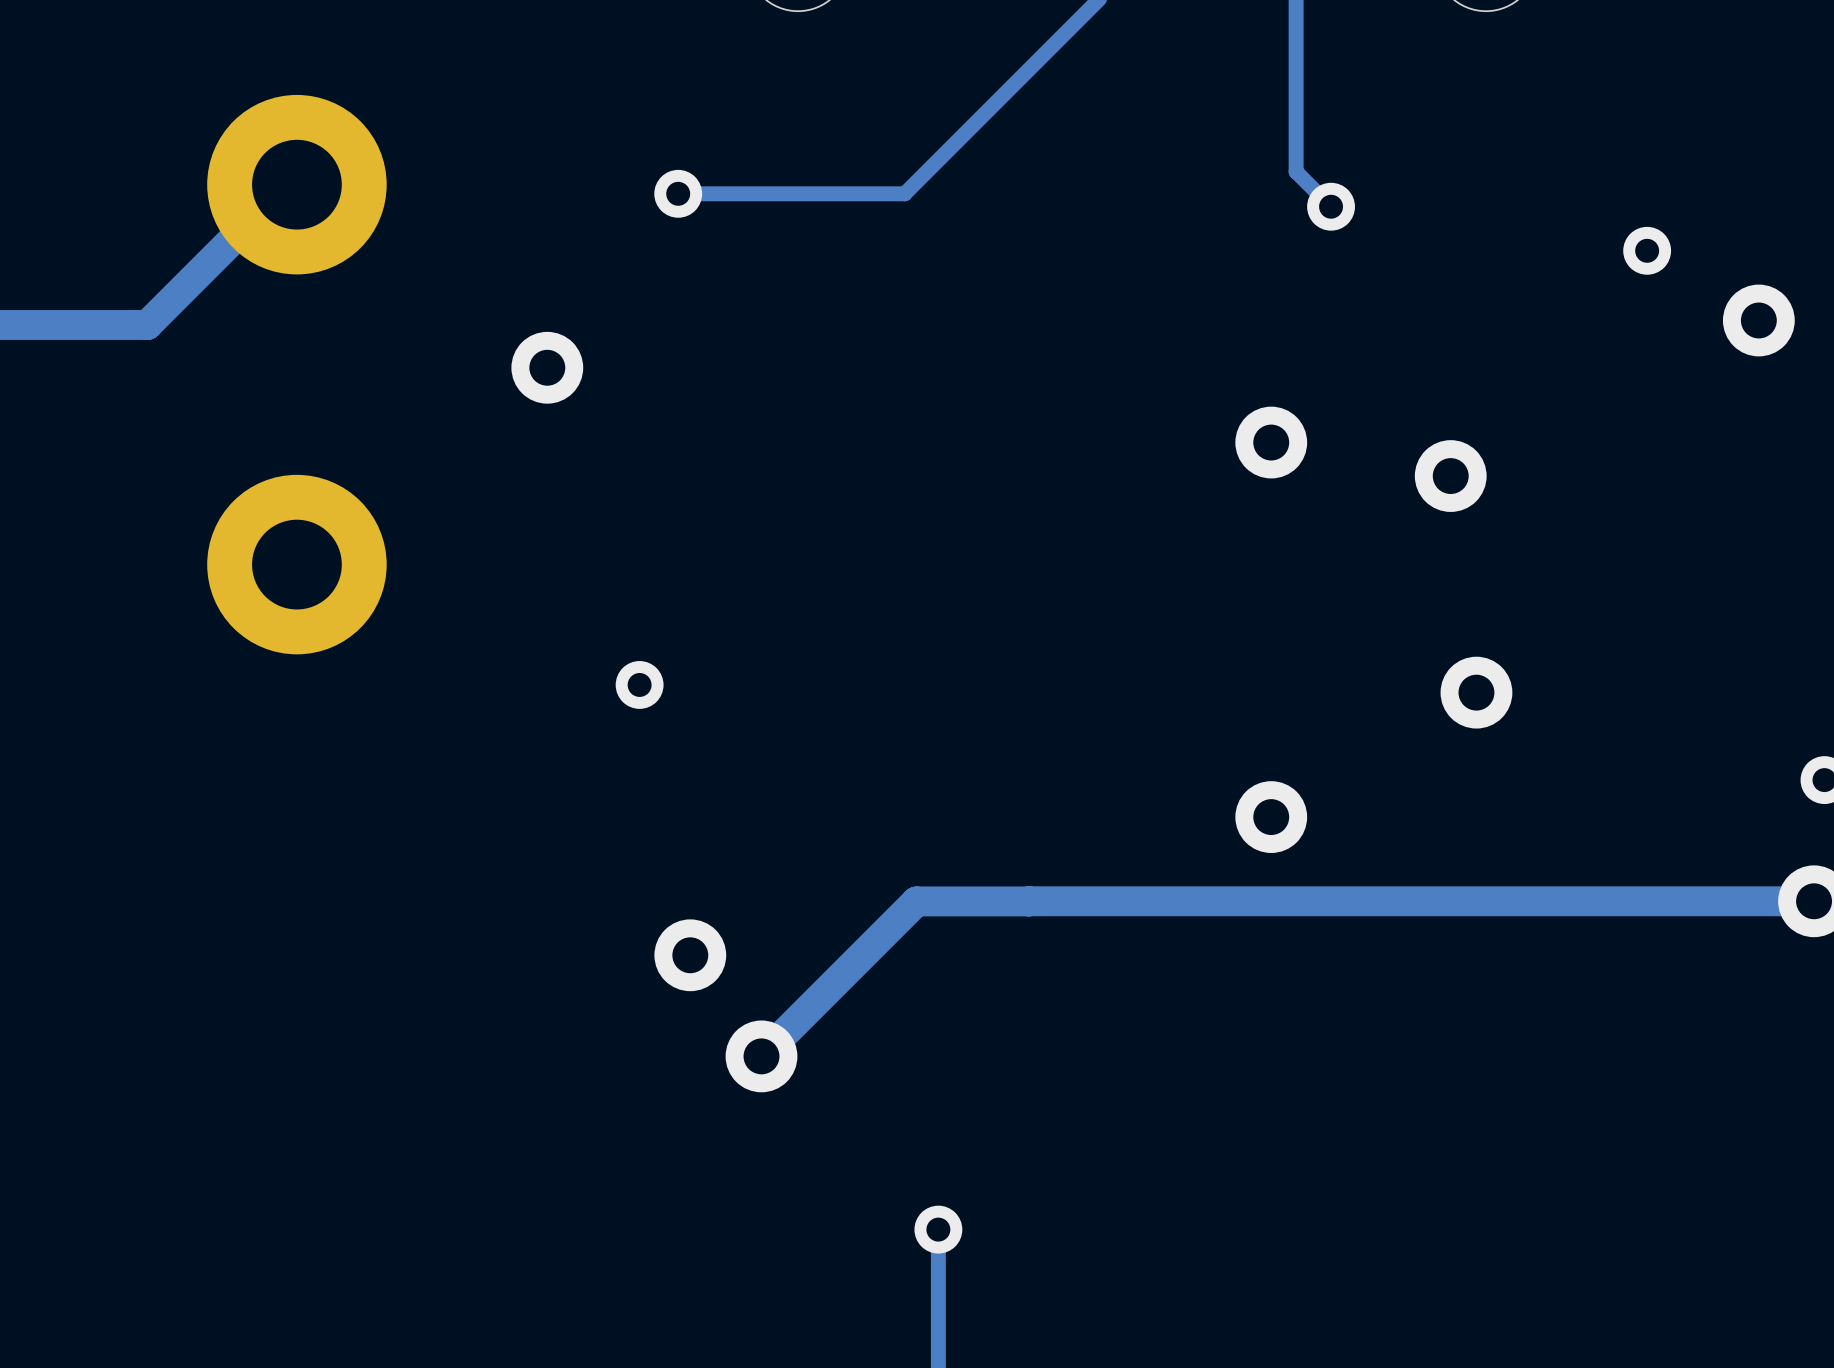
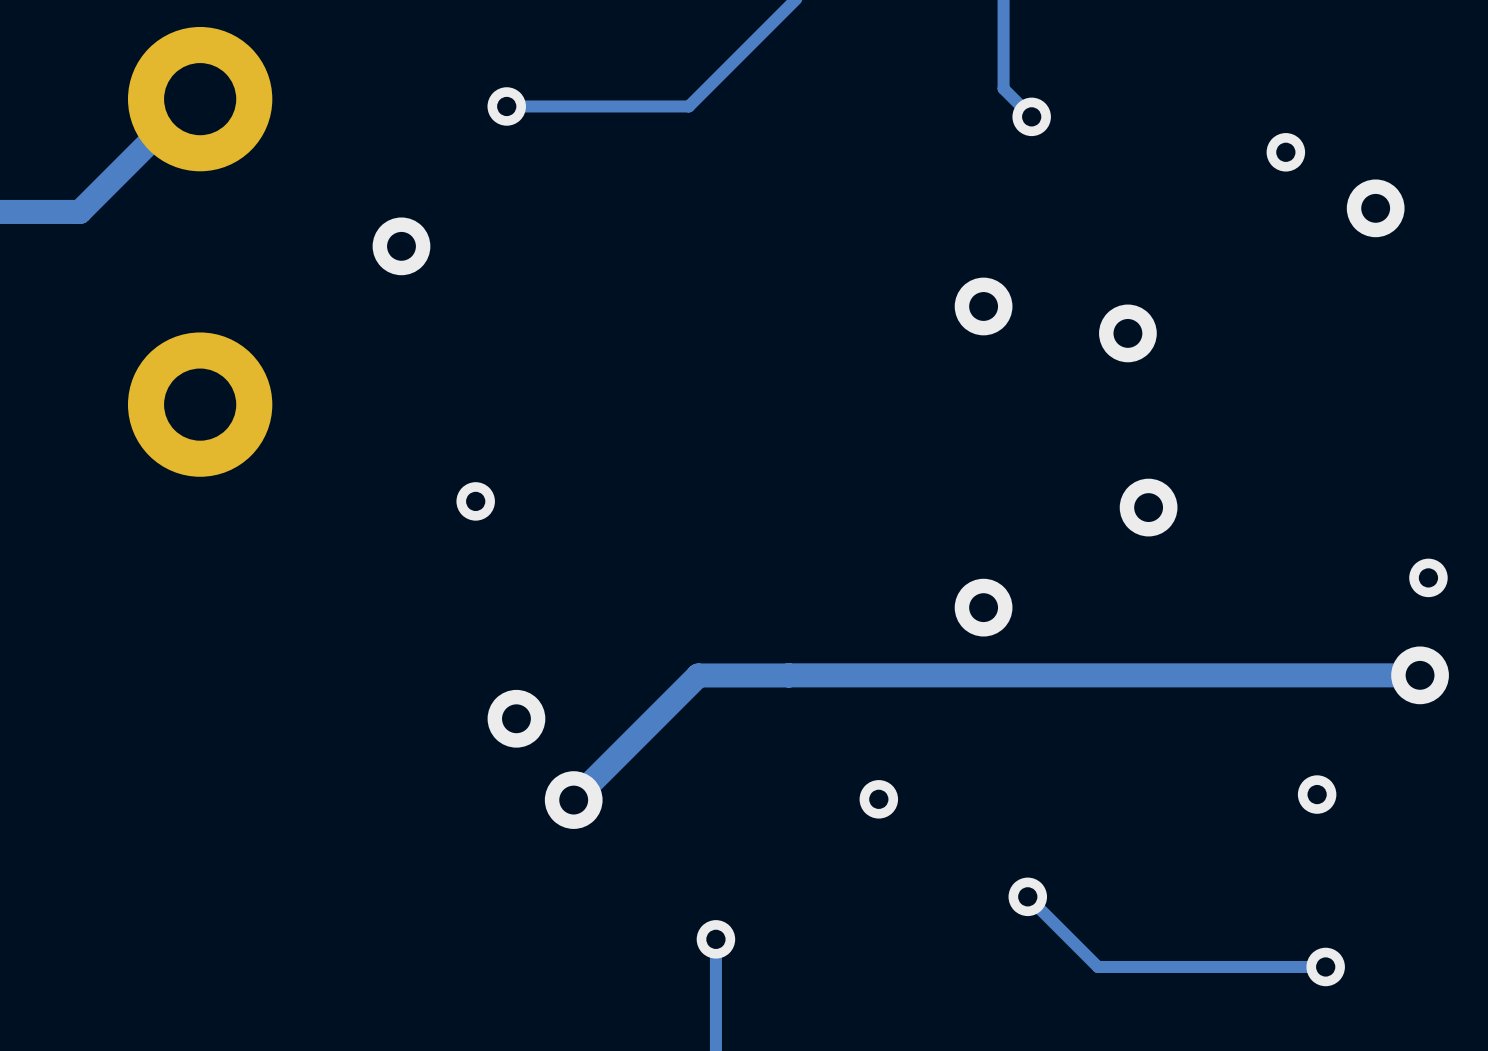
via: none -> (1317, 794)
via: none -> (878, 799)
track: none -> (1027, 896) (1097, 966) (1325, 966)
via: none -> (1027, 896)
via: none -> (1325, 966)

